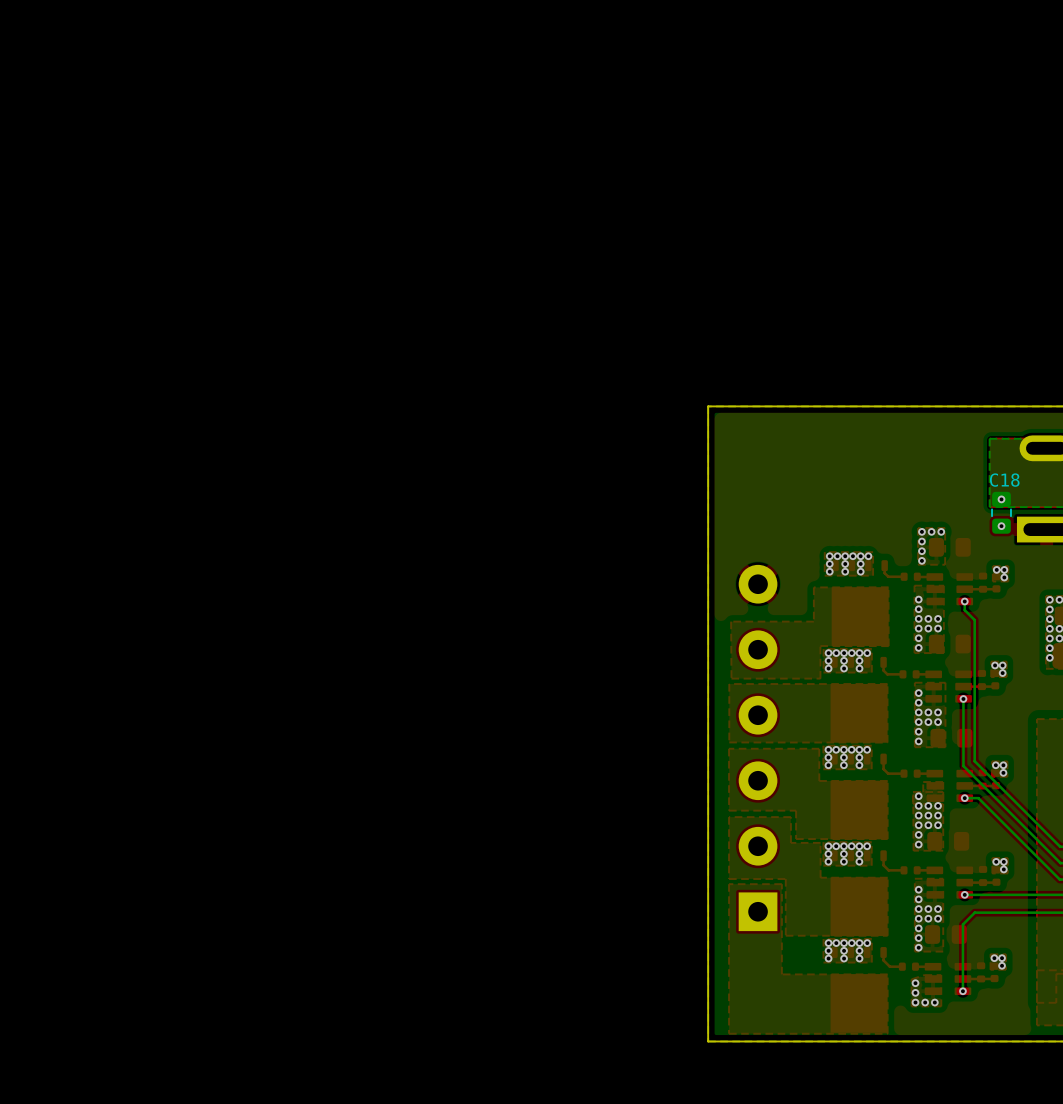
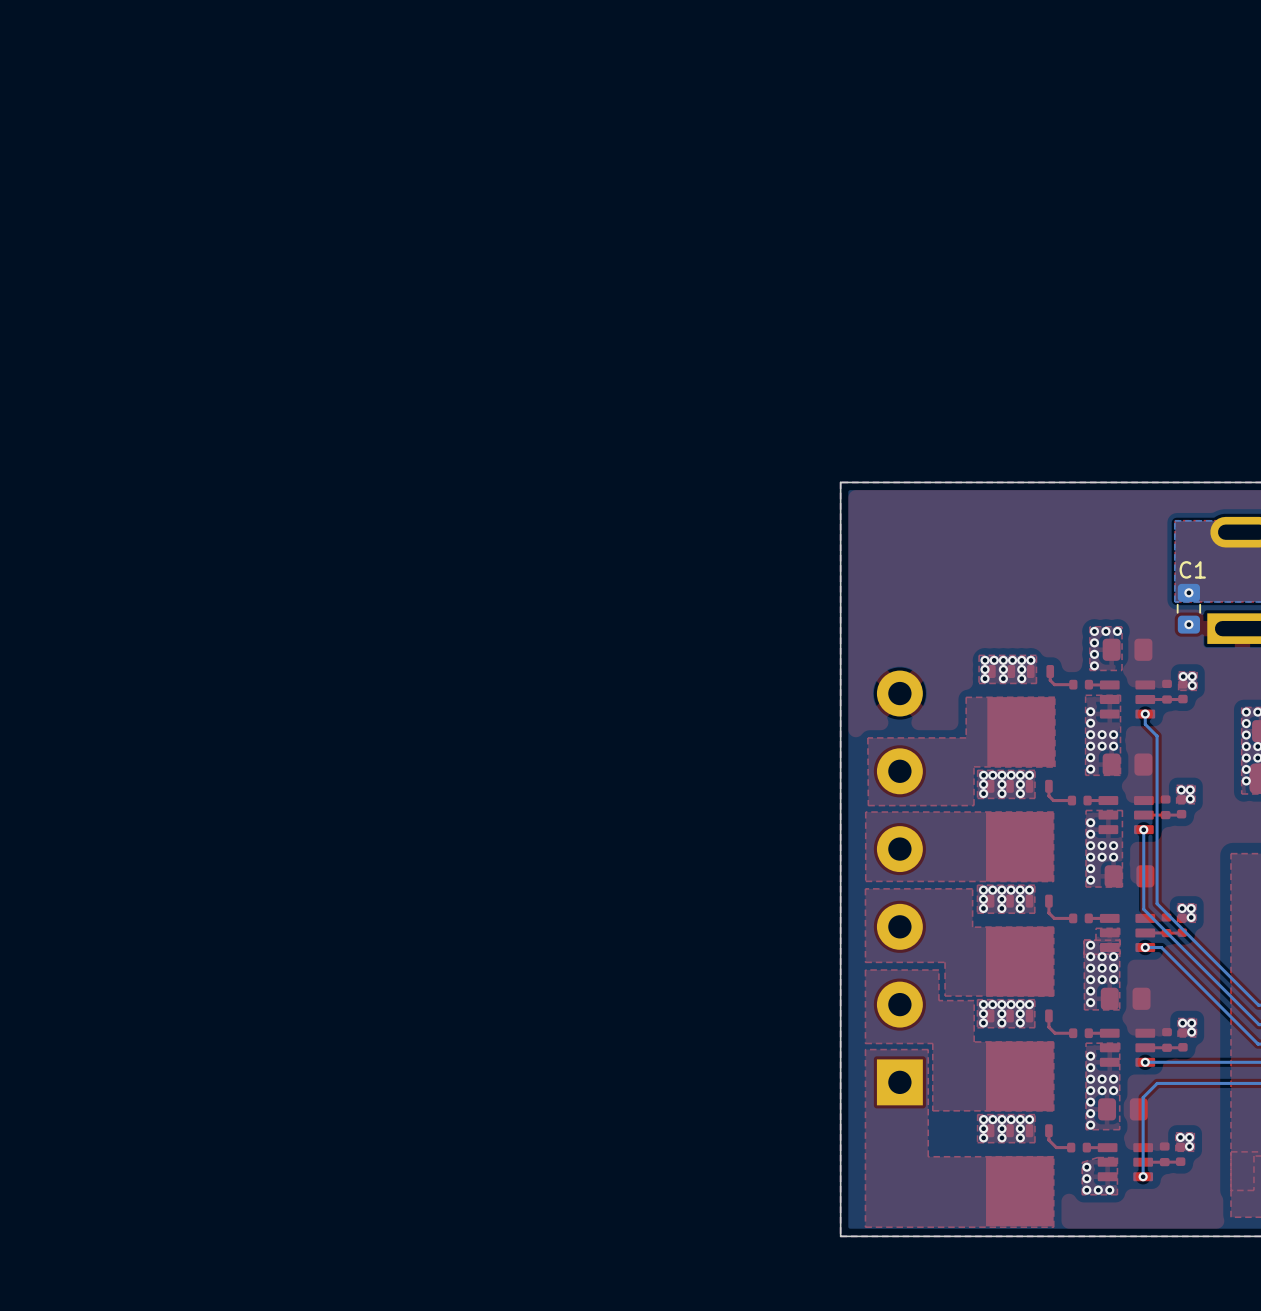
C18 name: C18 (1004, 480) -> C1 (1192, 569)

